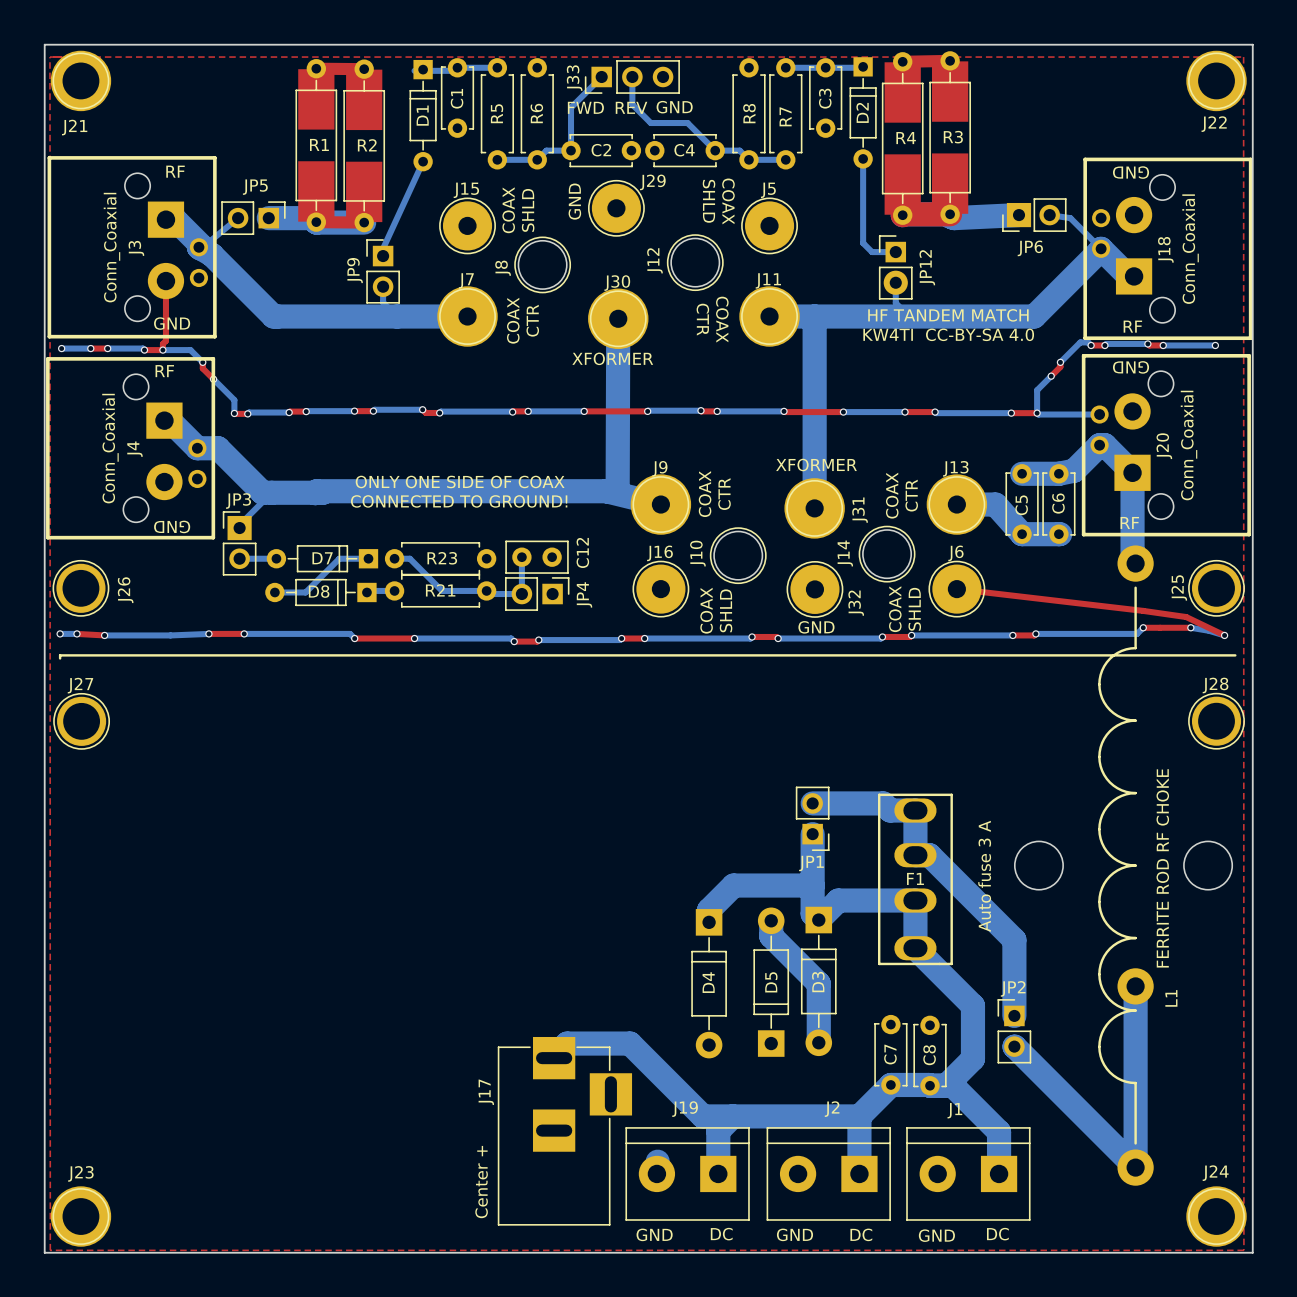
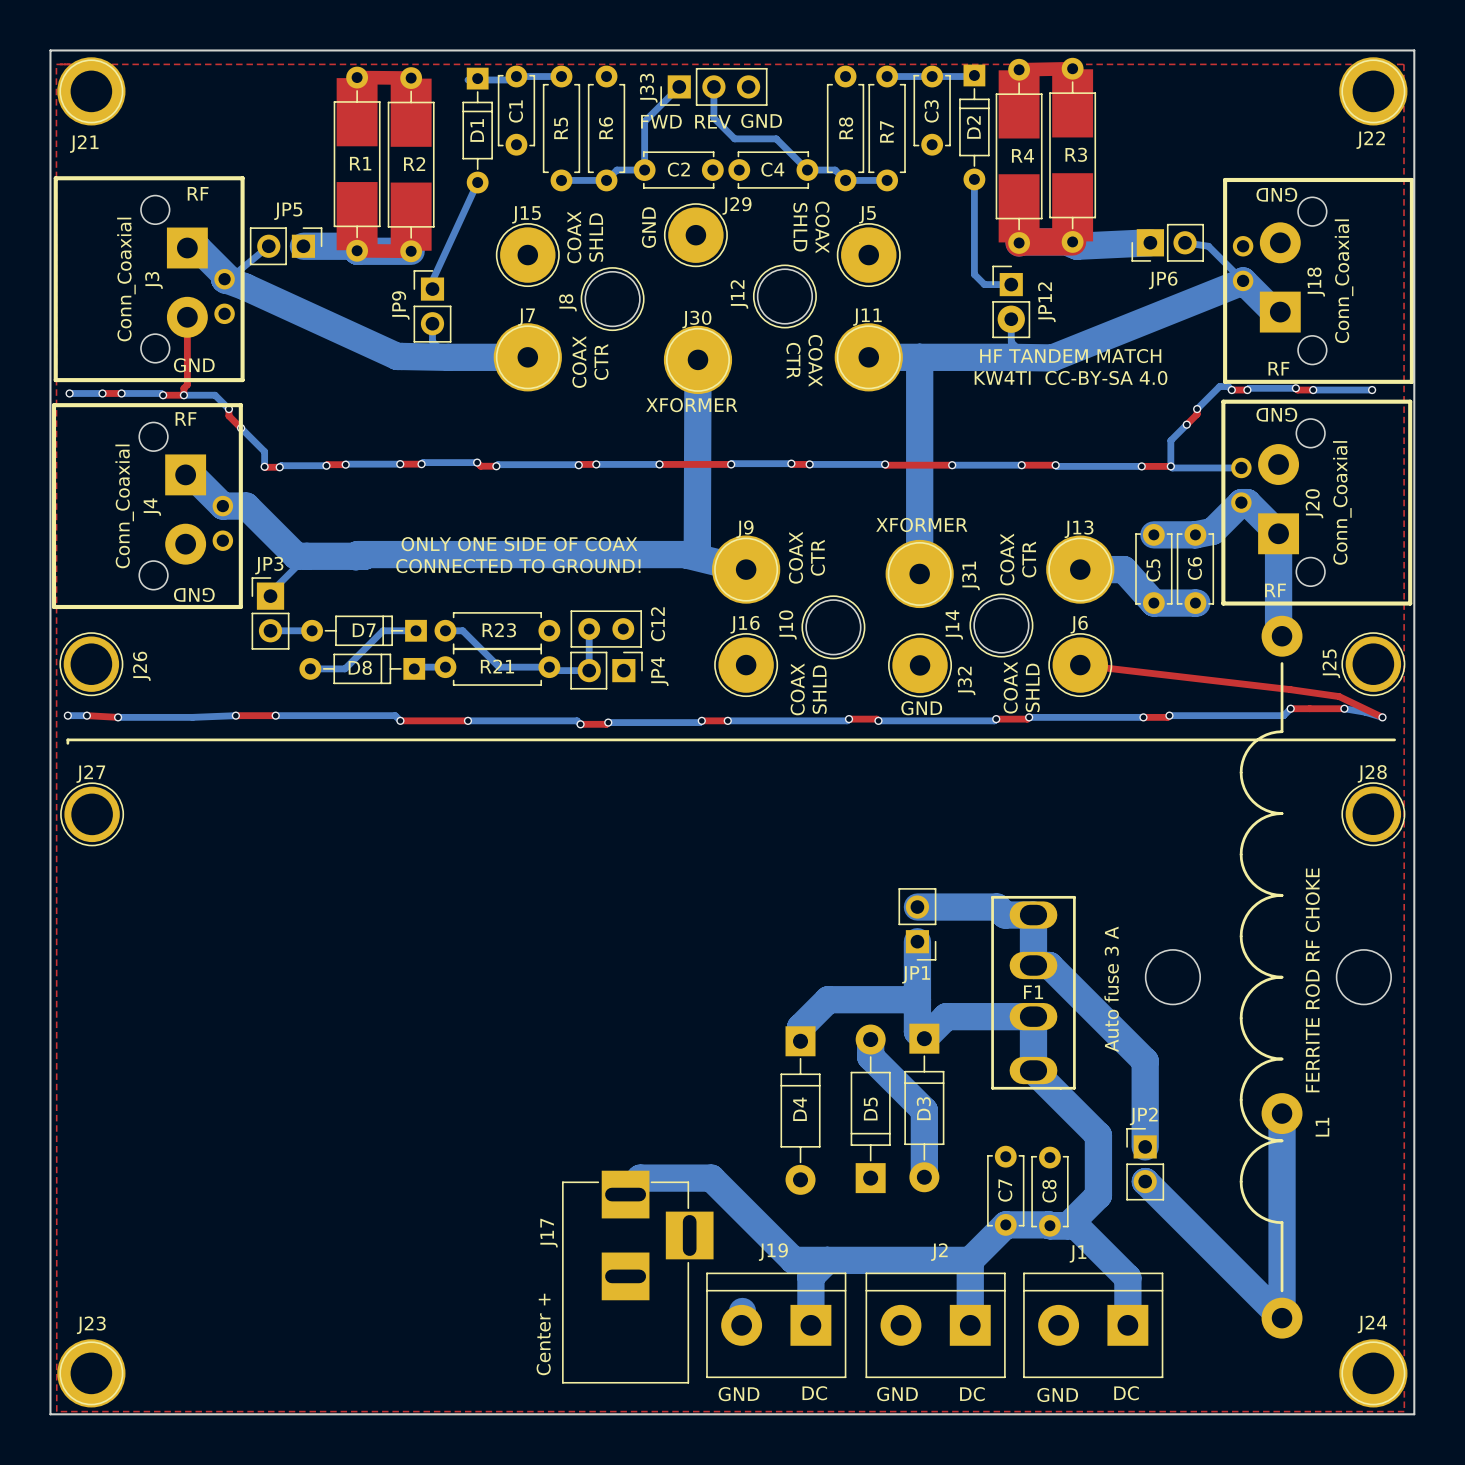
bottom track: (198, 247) (212, 254) (273, 316) (397, 316) -> (224, 279) (397, 356) (448, 357)
bottom track: (1101, 249) (1034, 316) (896, 316) -> (1243, 281) (1052, 357) (1012, 357)

